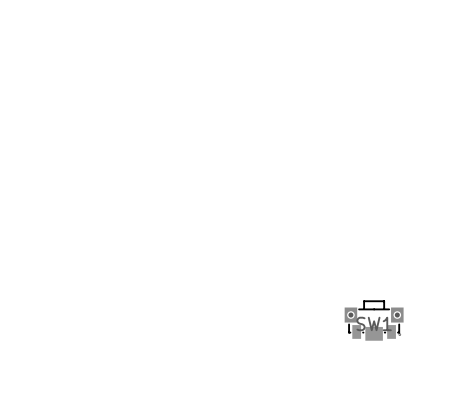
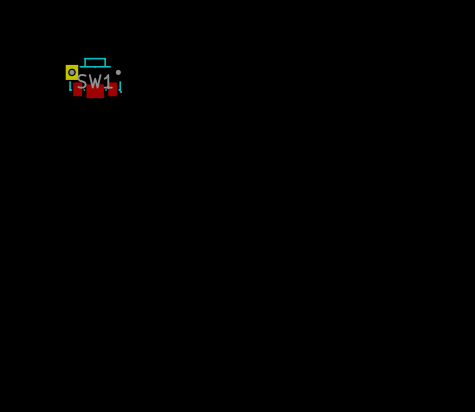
SW1 footprint: [344, 300, 404, 341] -> [65, 58, 122, 99]

